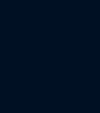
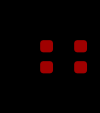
part: none -> (46, 56)
part: none -> (80, 56)

